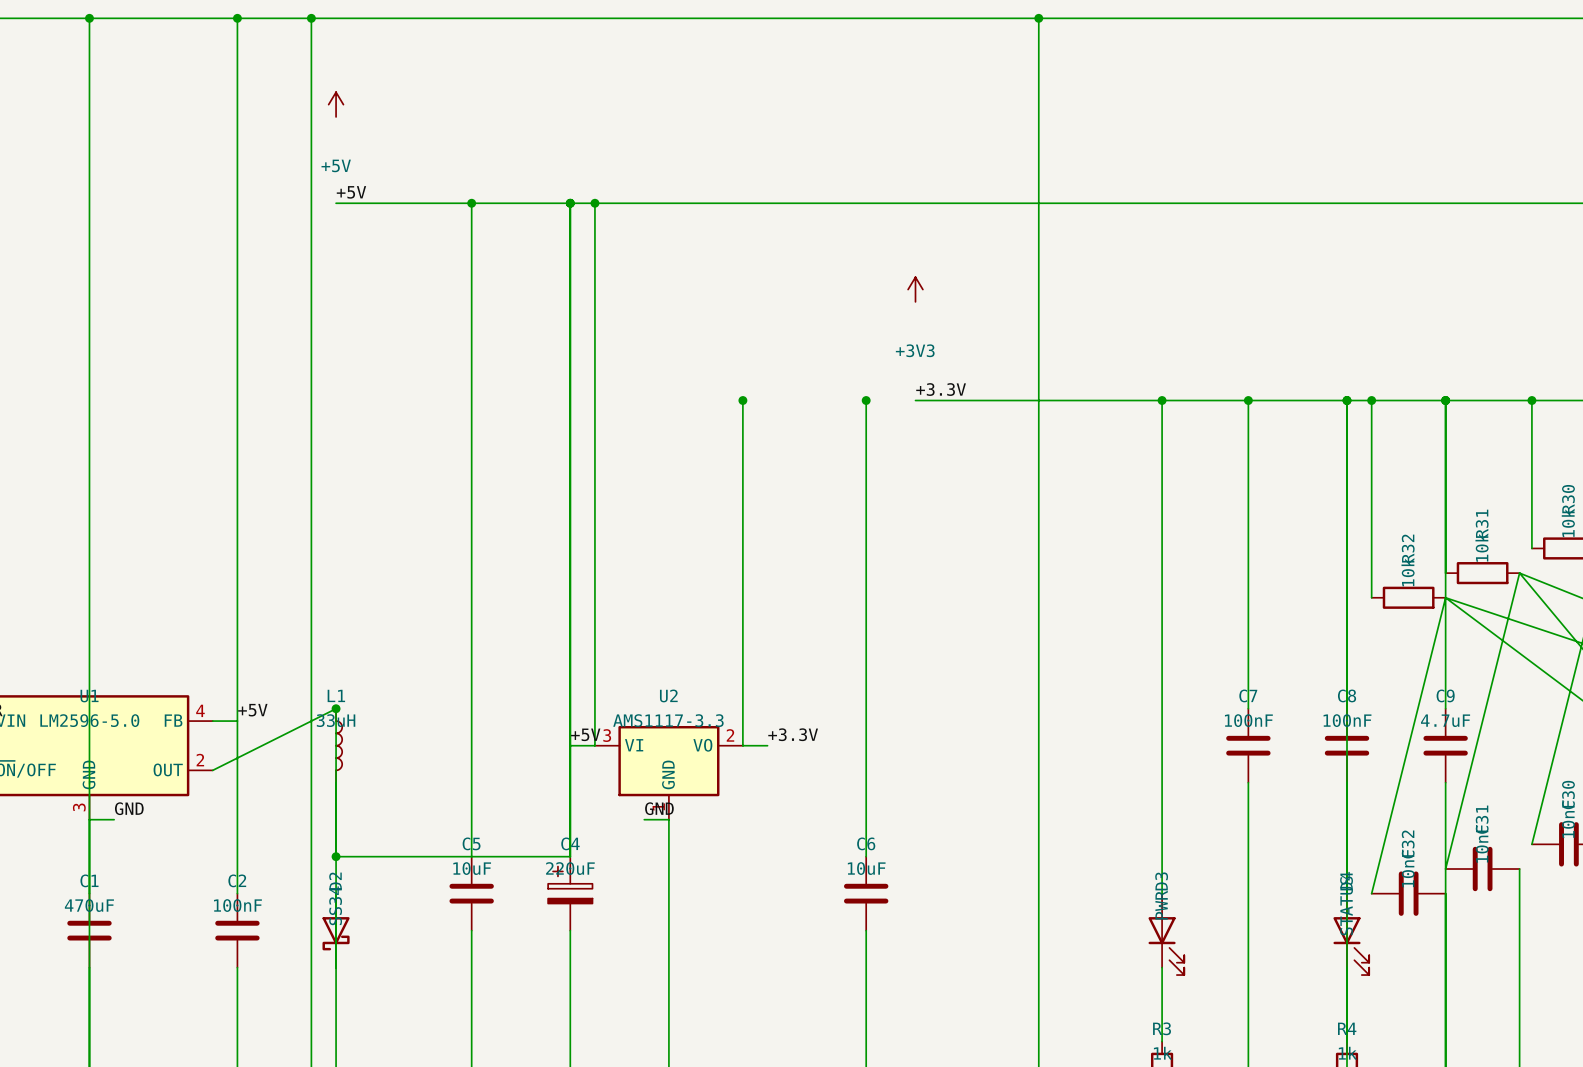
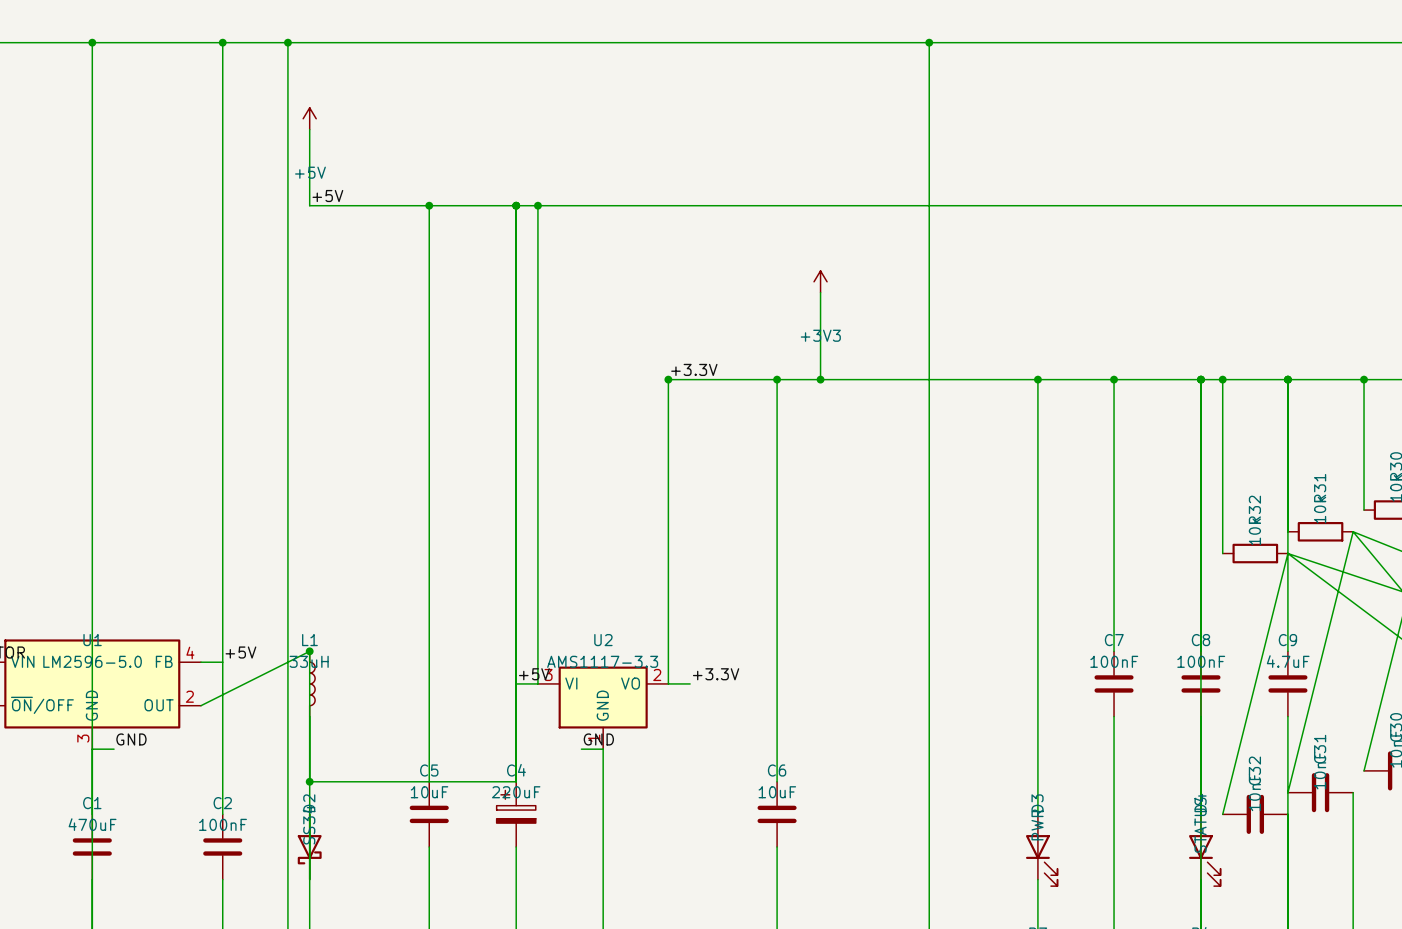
wire: none -> (309, 129) (309, 205)
wire: none -> (820, 292) (820, 379) (668, 379)
label position: +3.3V (941, 389) -> +3.3V (694, 369)
junction: none -> (820, 379)

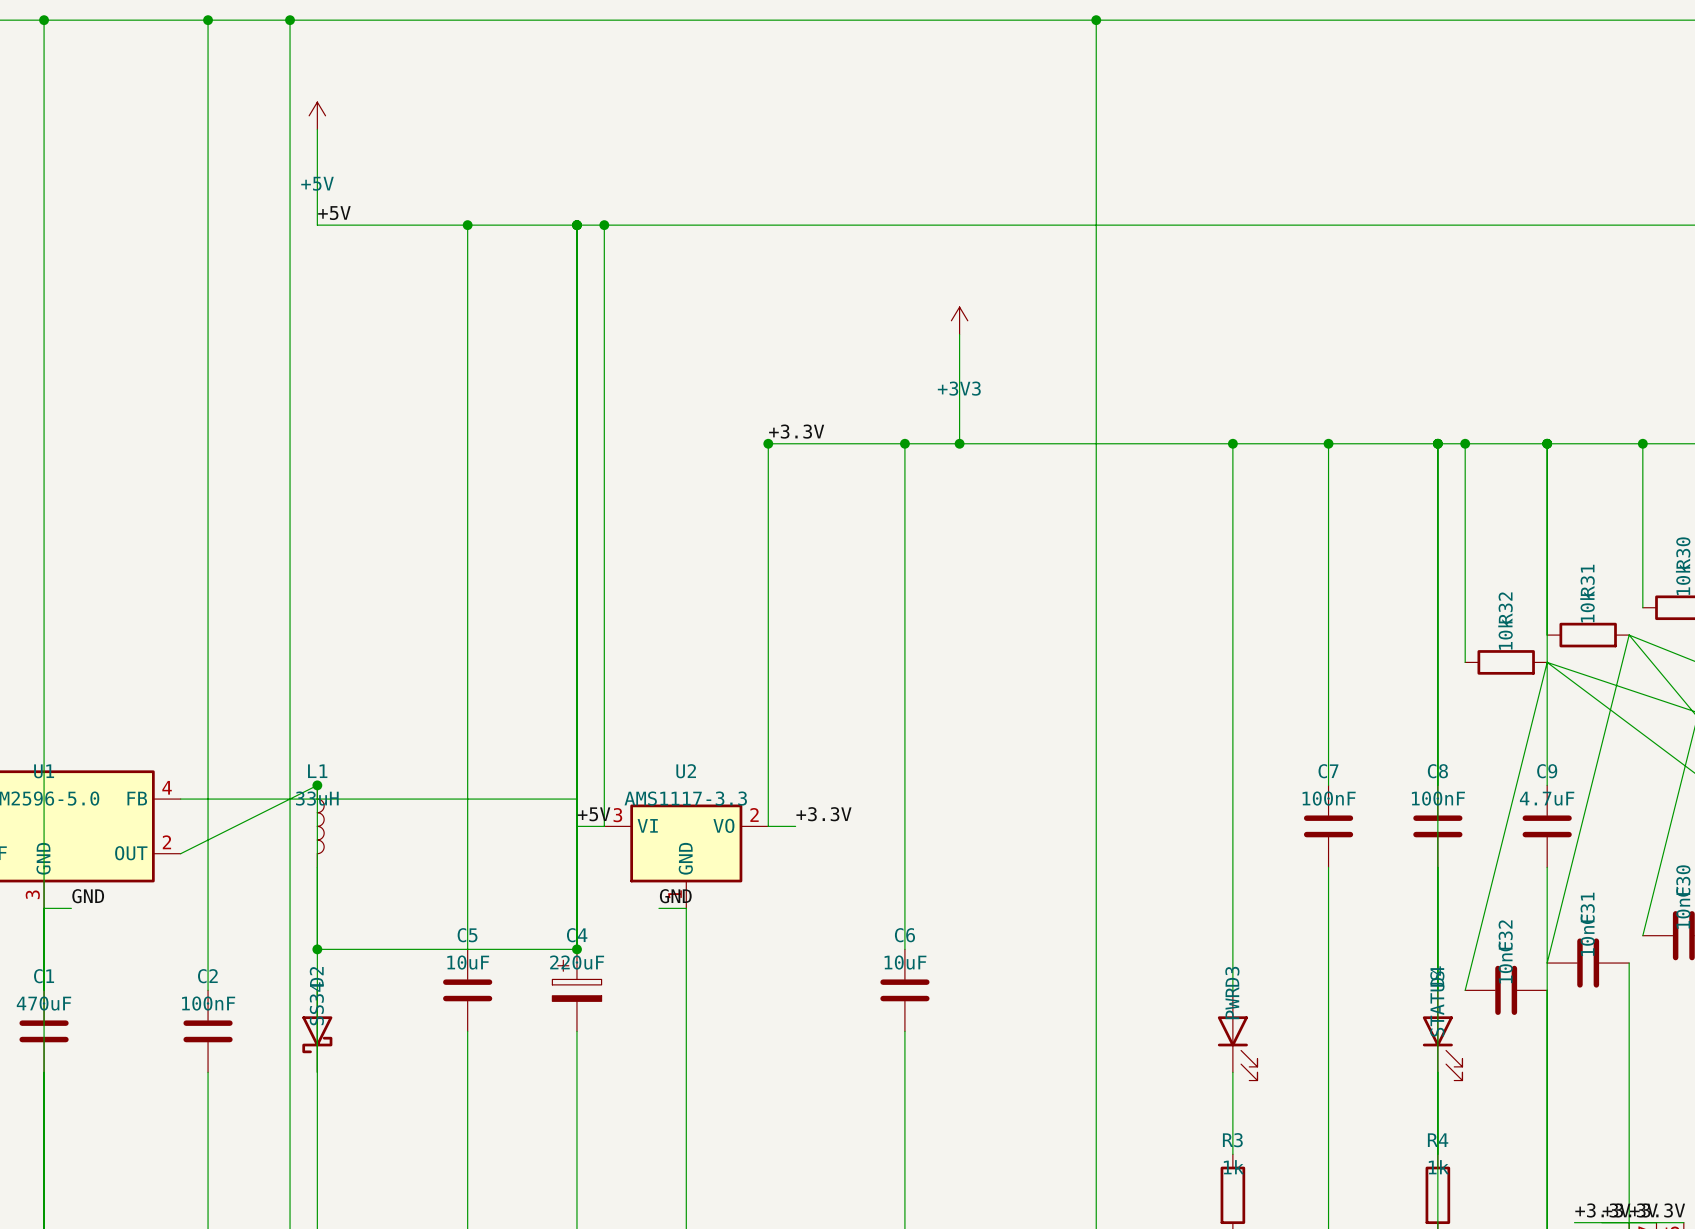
label: +5V (240, 652) -> none
wire: none -> (208, 799) (576, 799)
junction: none -> (576, 949)

